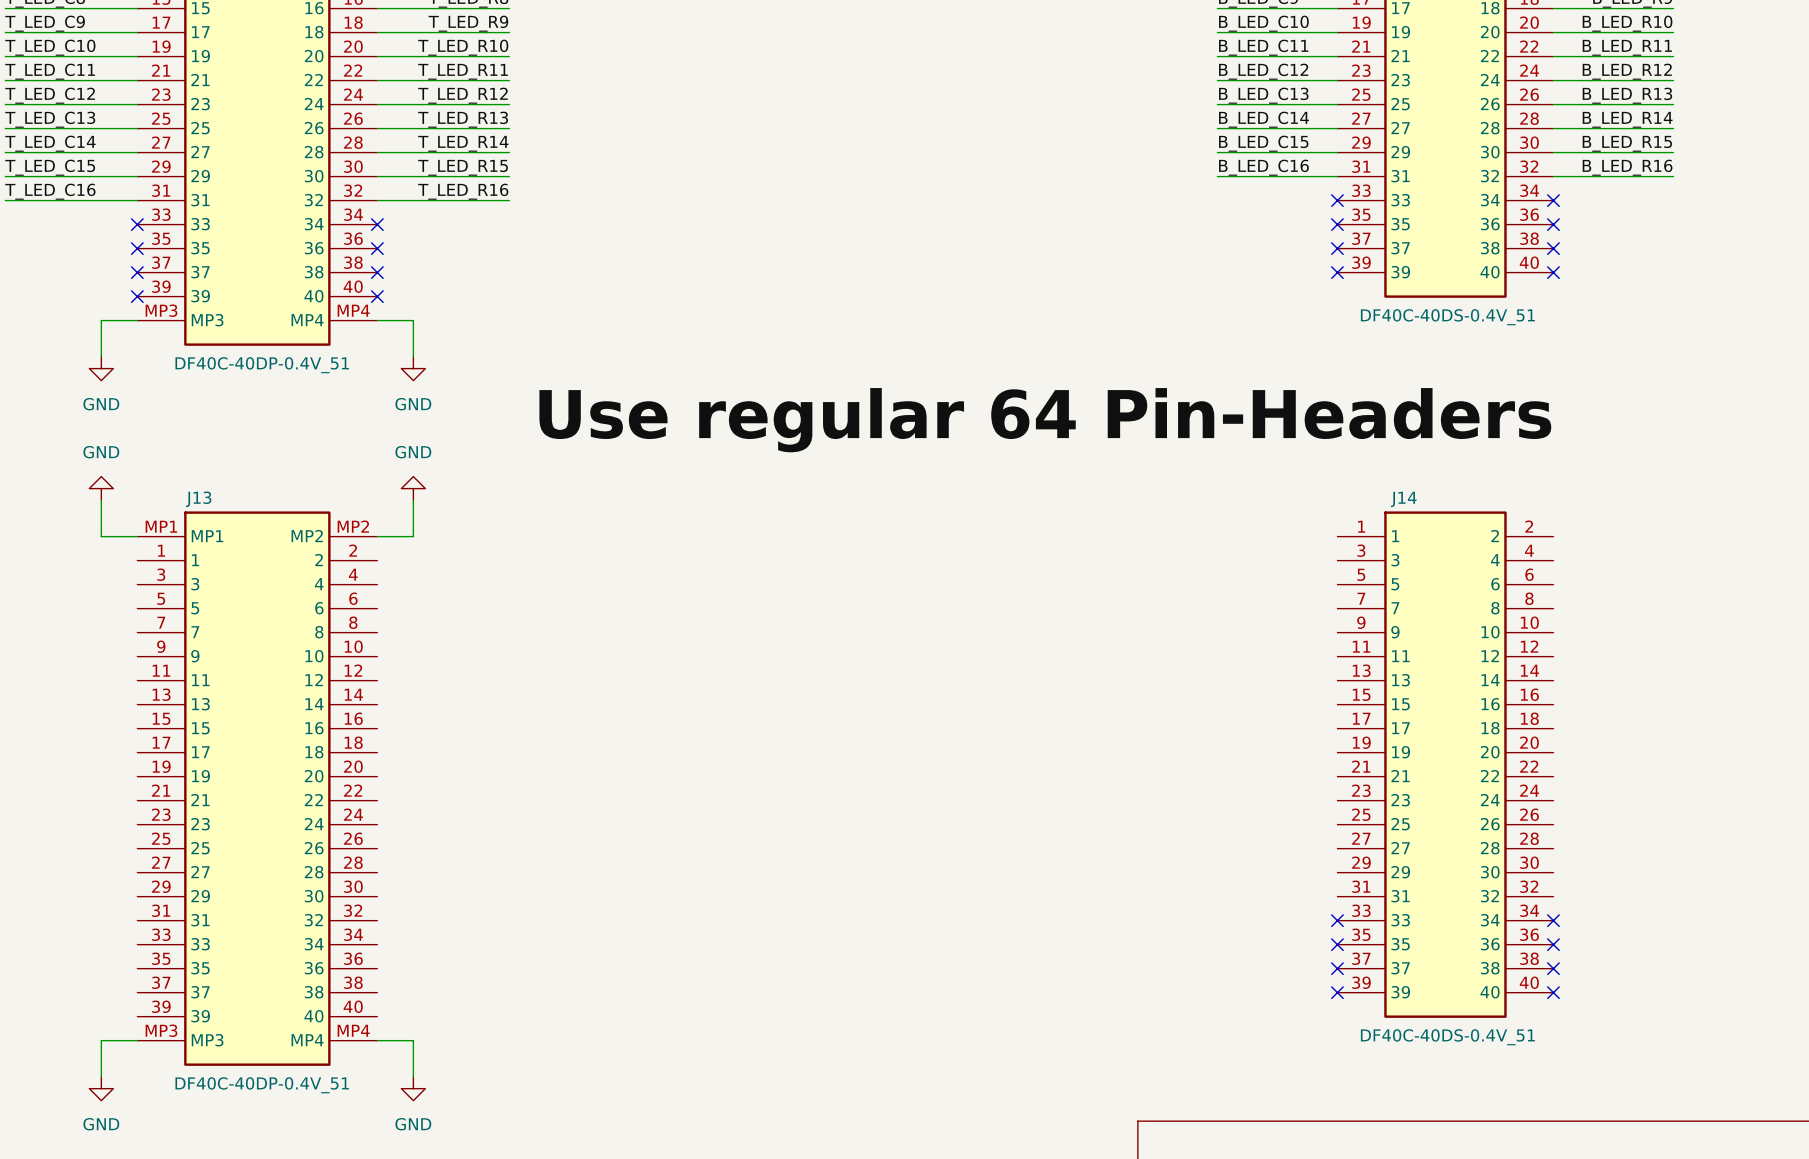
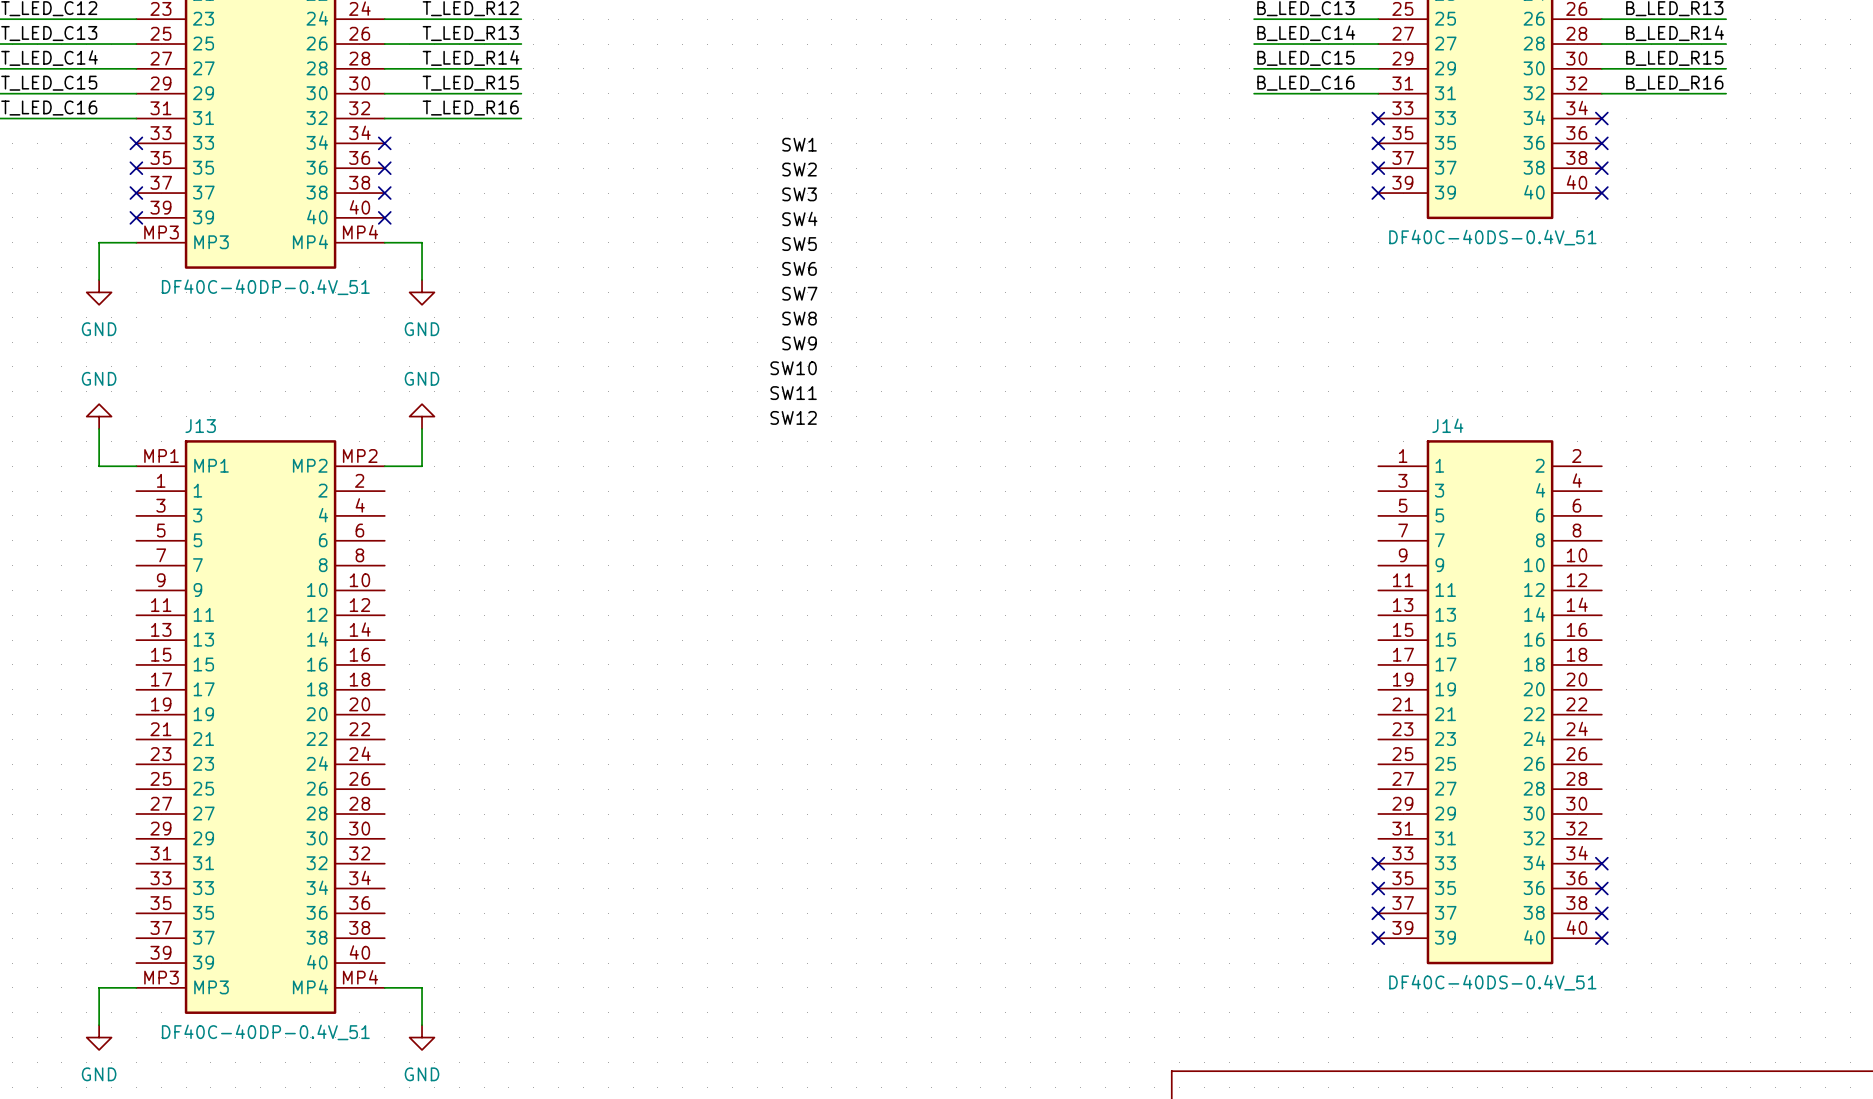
label: none -> SW1 (799, 144)
label: none -> SW2 (799, 169)
label: none -> SW3 (799, 194)
label: none -> SW4 (799, 218)
label: none -> SW5 (799, 244)
label: none -> SW6 (799, 268)
label: none -> SW7 (799, 293)
label: none -> SW8 (799, 318)
label: none -> SW9 (799, 343)
label: Use regular 64 Pin-Headers (1045, 420) -> none
label: none -> SW10 (793, 368)
label: none -> SW11 (793, 393)
label: none -> SW12 (793, 417)

